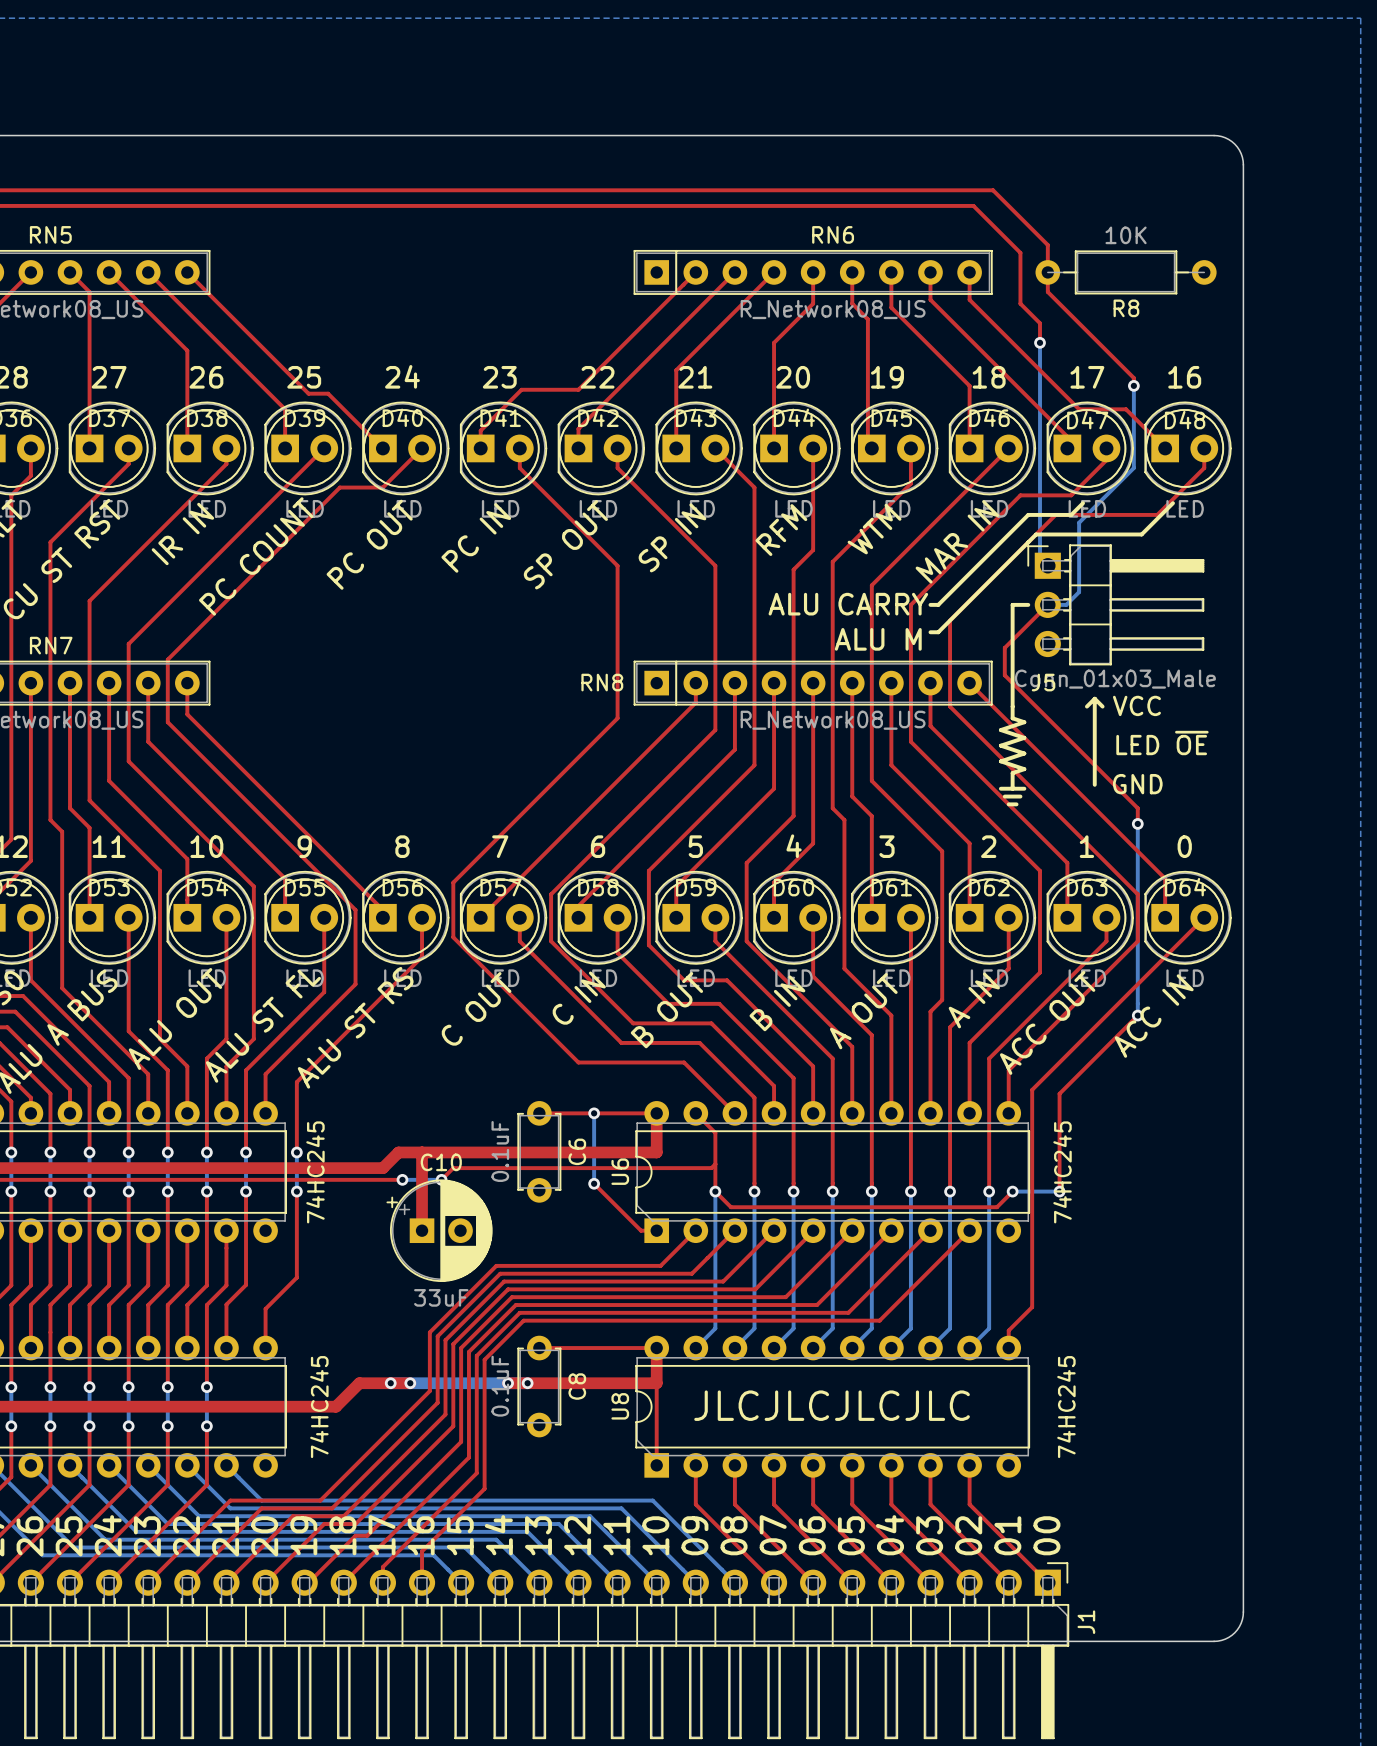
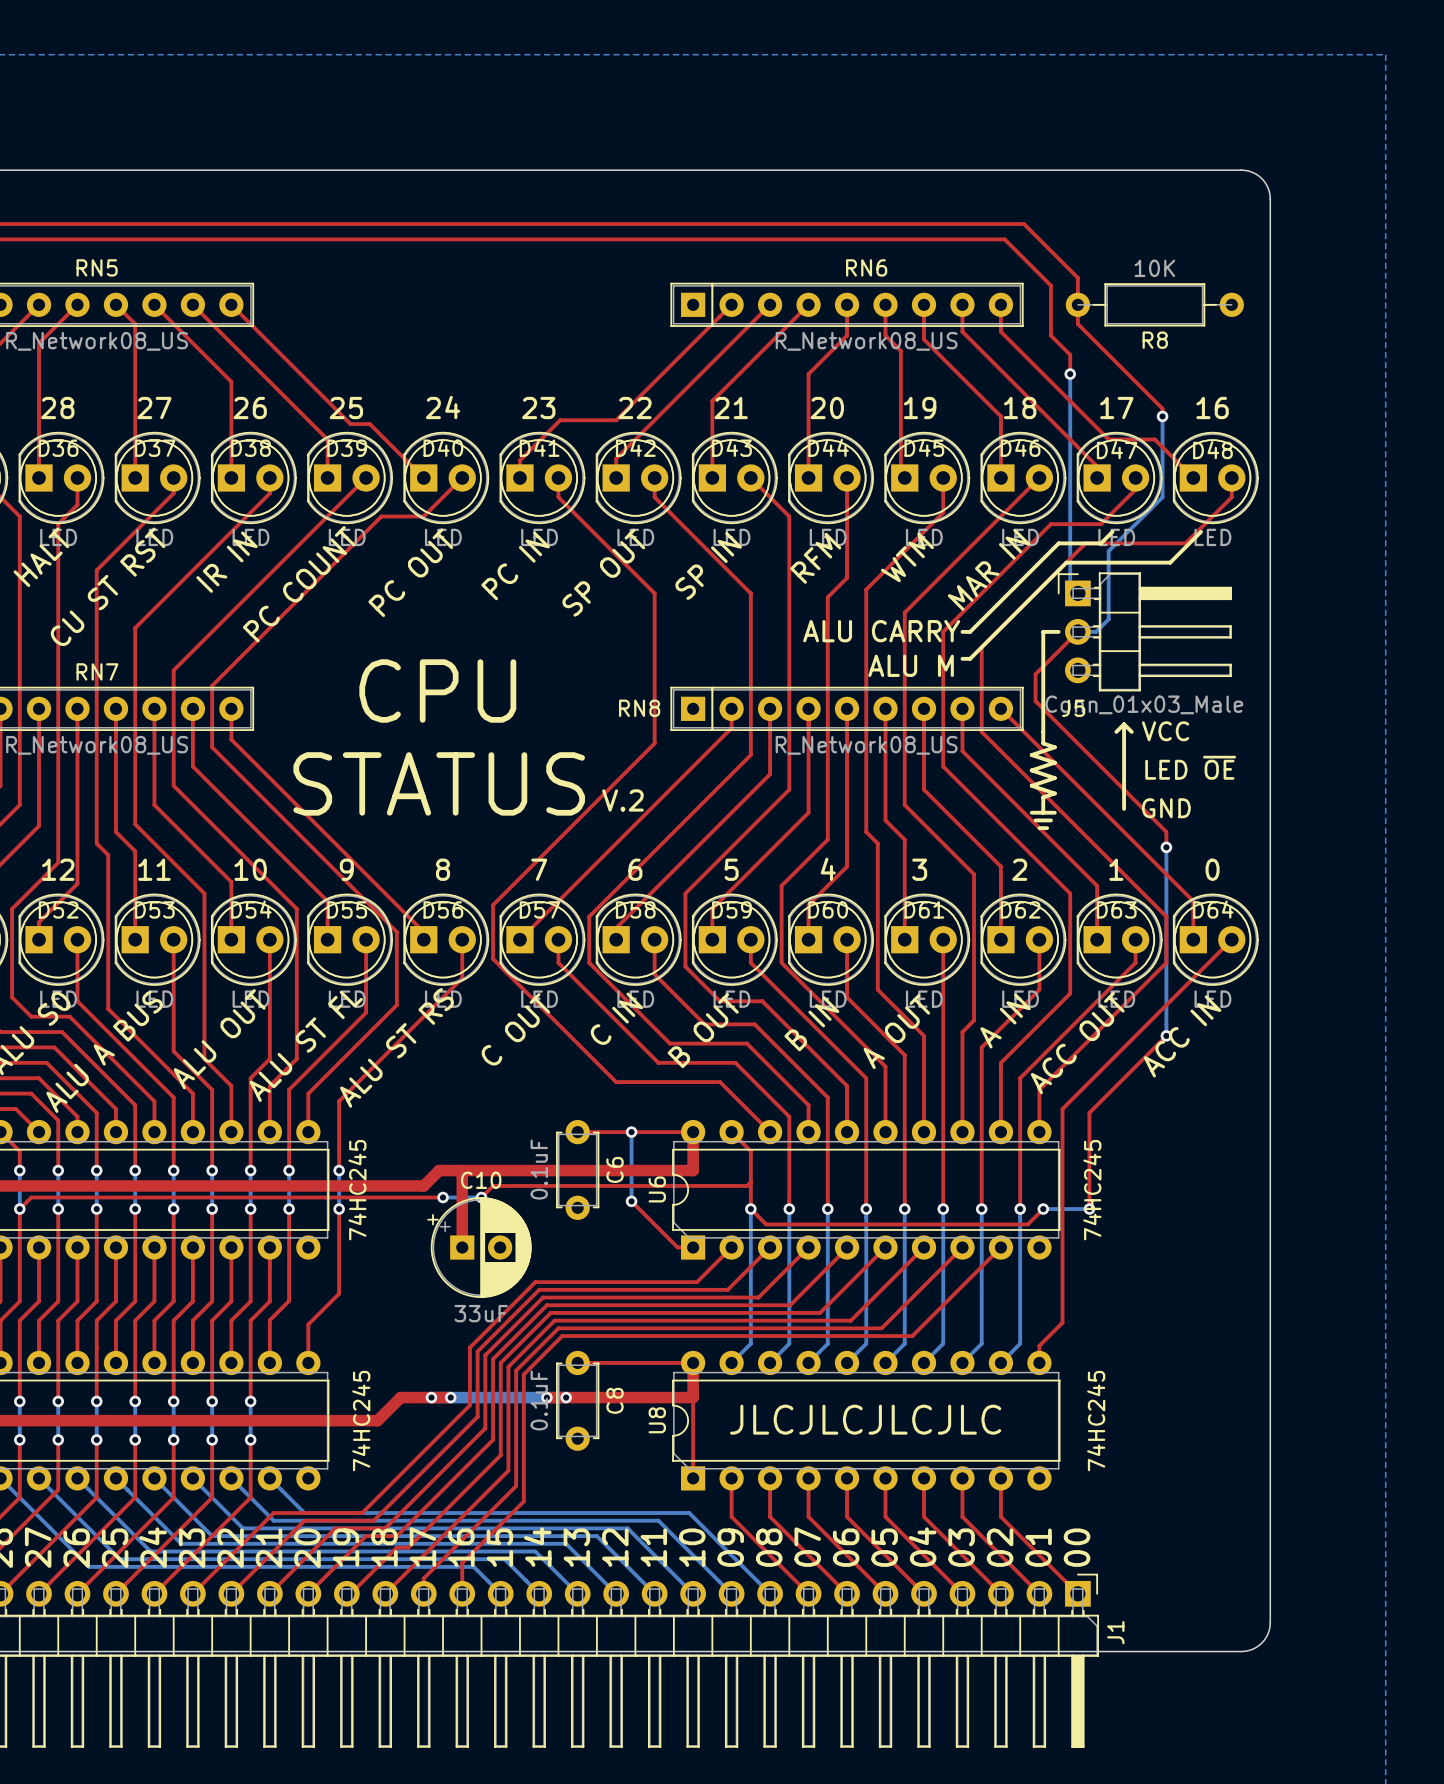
text: none -> CPU (437, 691)
text: none -> STATUS (439, 783)
text: none -> V.2 (622, 800)

